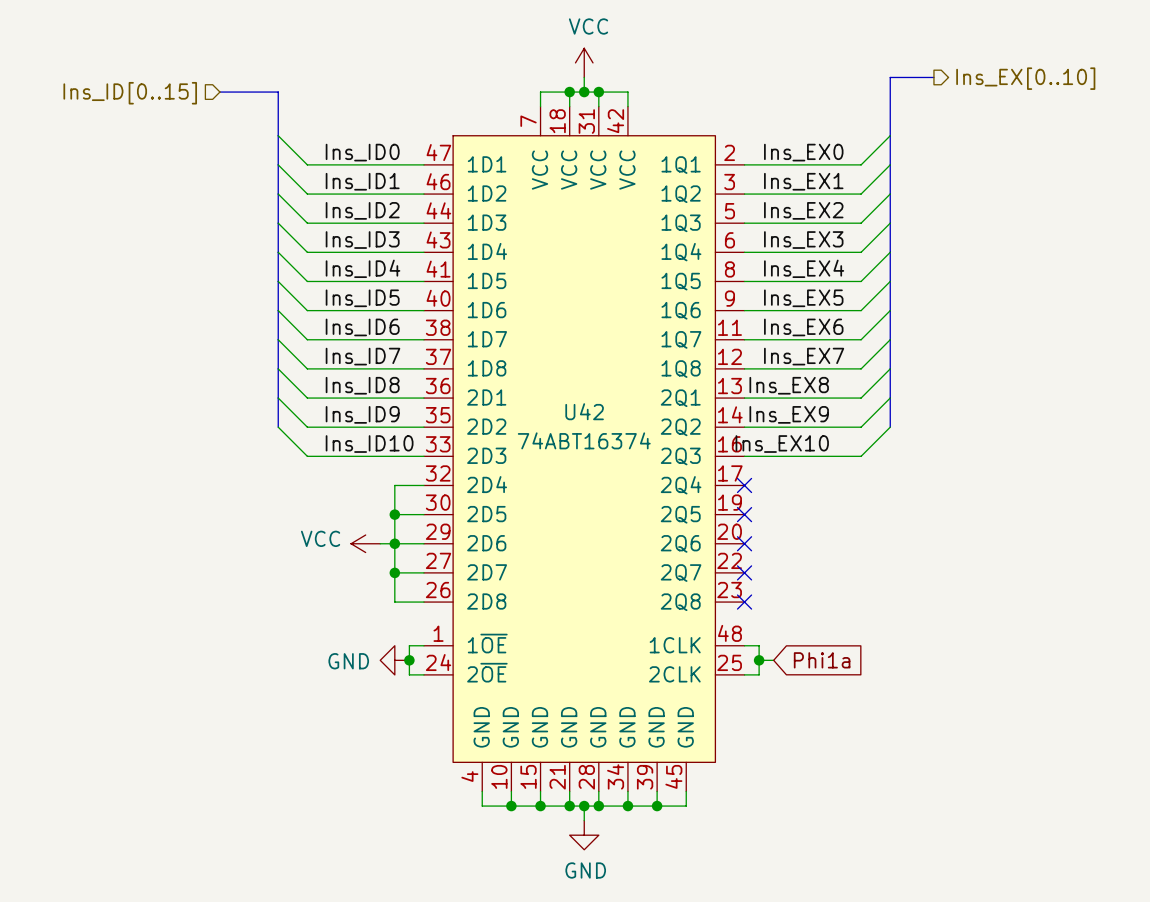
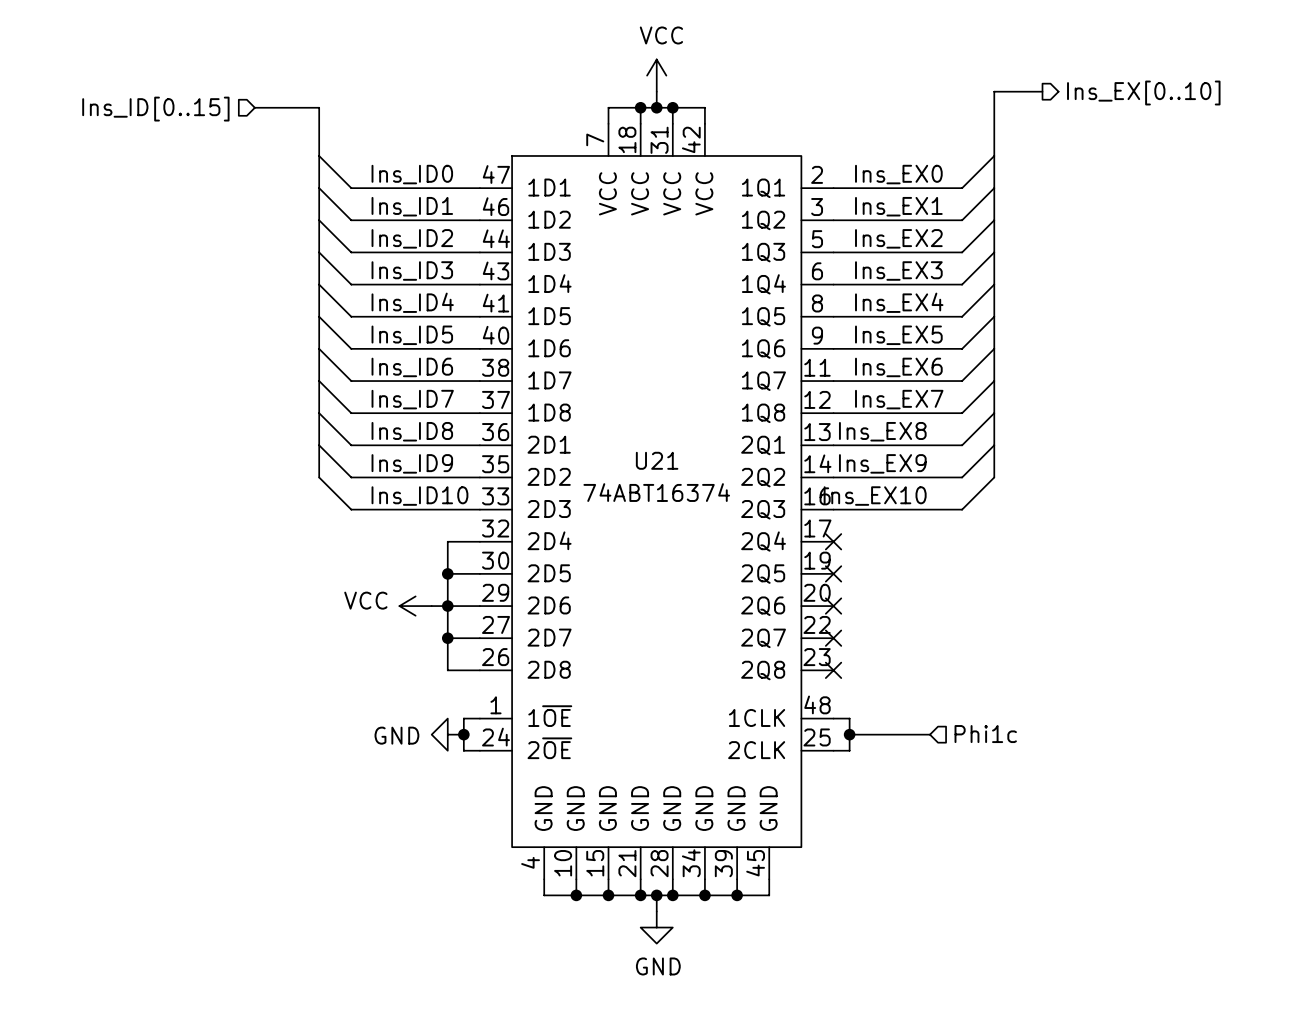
U42 name: U42 (584, 411) -> U21 (657, 460)
hierarchical label: none -> Phi1c (985, 734)
wire: none -> (865, 734) (929, 734)
global label: Phi1a (822, 660) -> none

